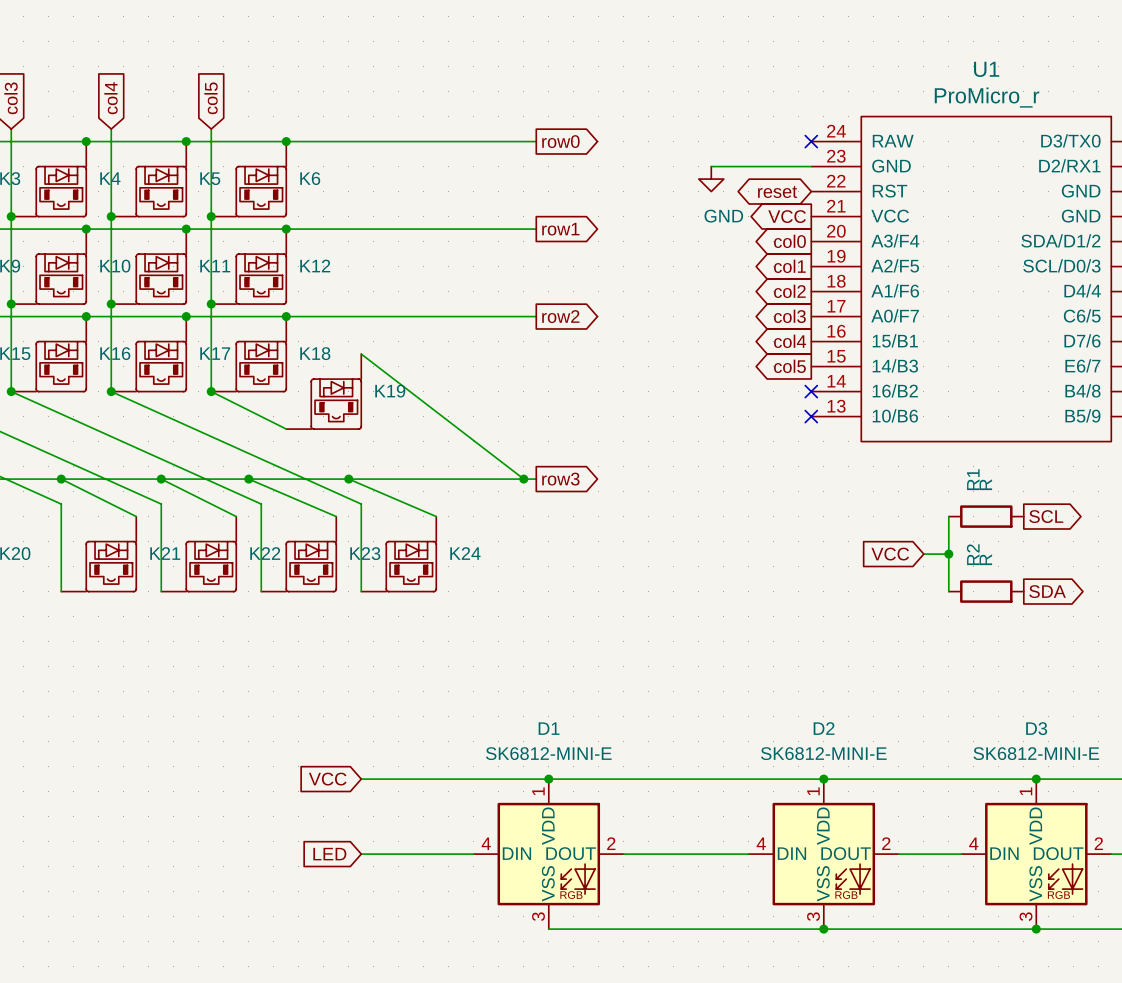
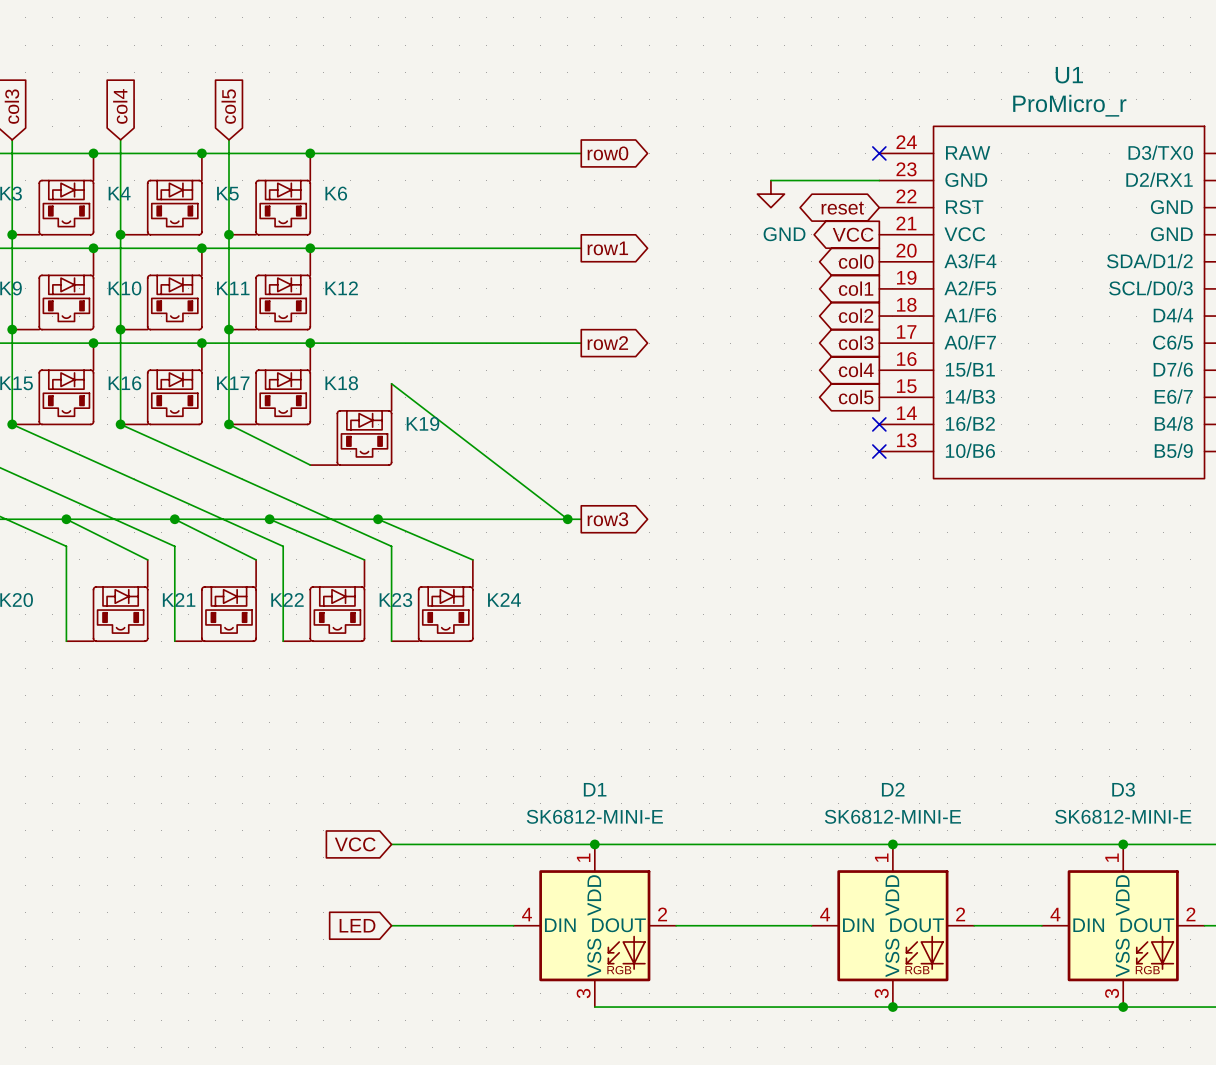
wire: (948, 516) (948, 591) -> none
R1: R (986, 516) -> none
global label: SCL (1046, 516) -> none
global label: VCC (890, 554) -> none
wire: (923, 554) (948, 554) -> none
junction: (948, 554) -> none
R2: R (986, 591) -> none
global label: SDA (1047, 591) -> none

